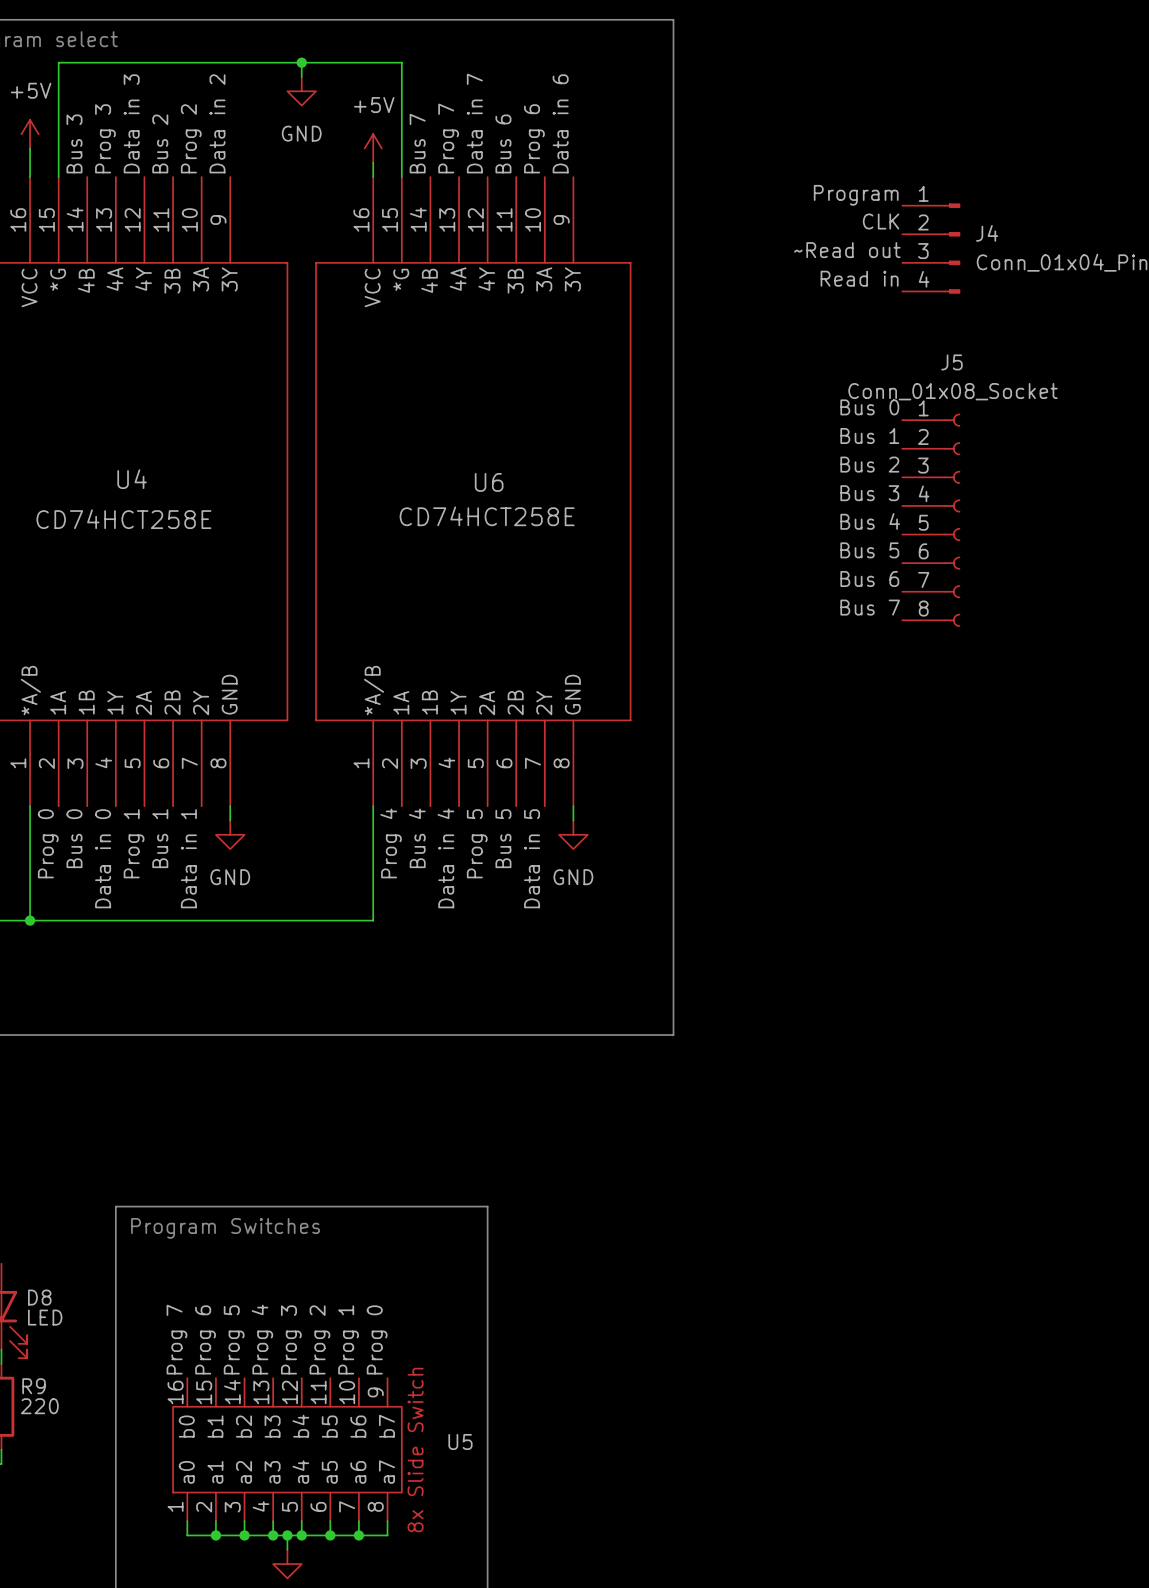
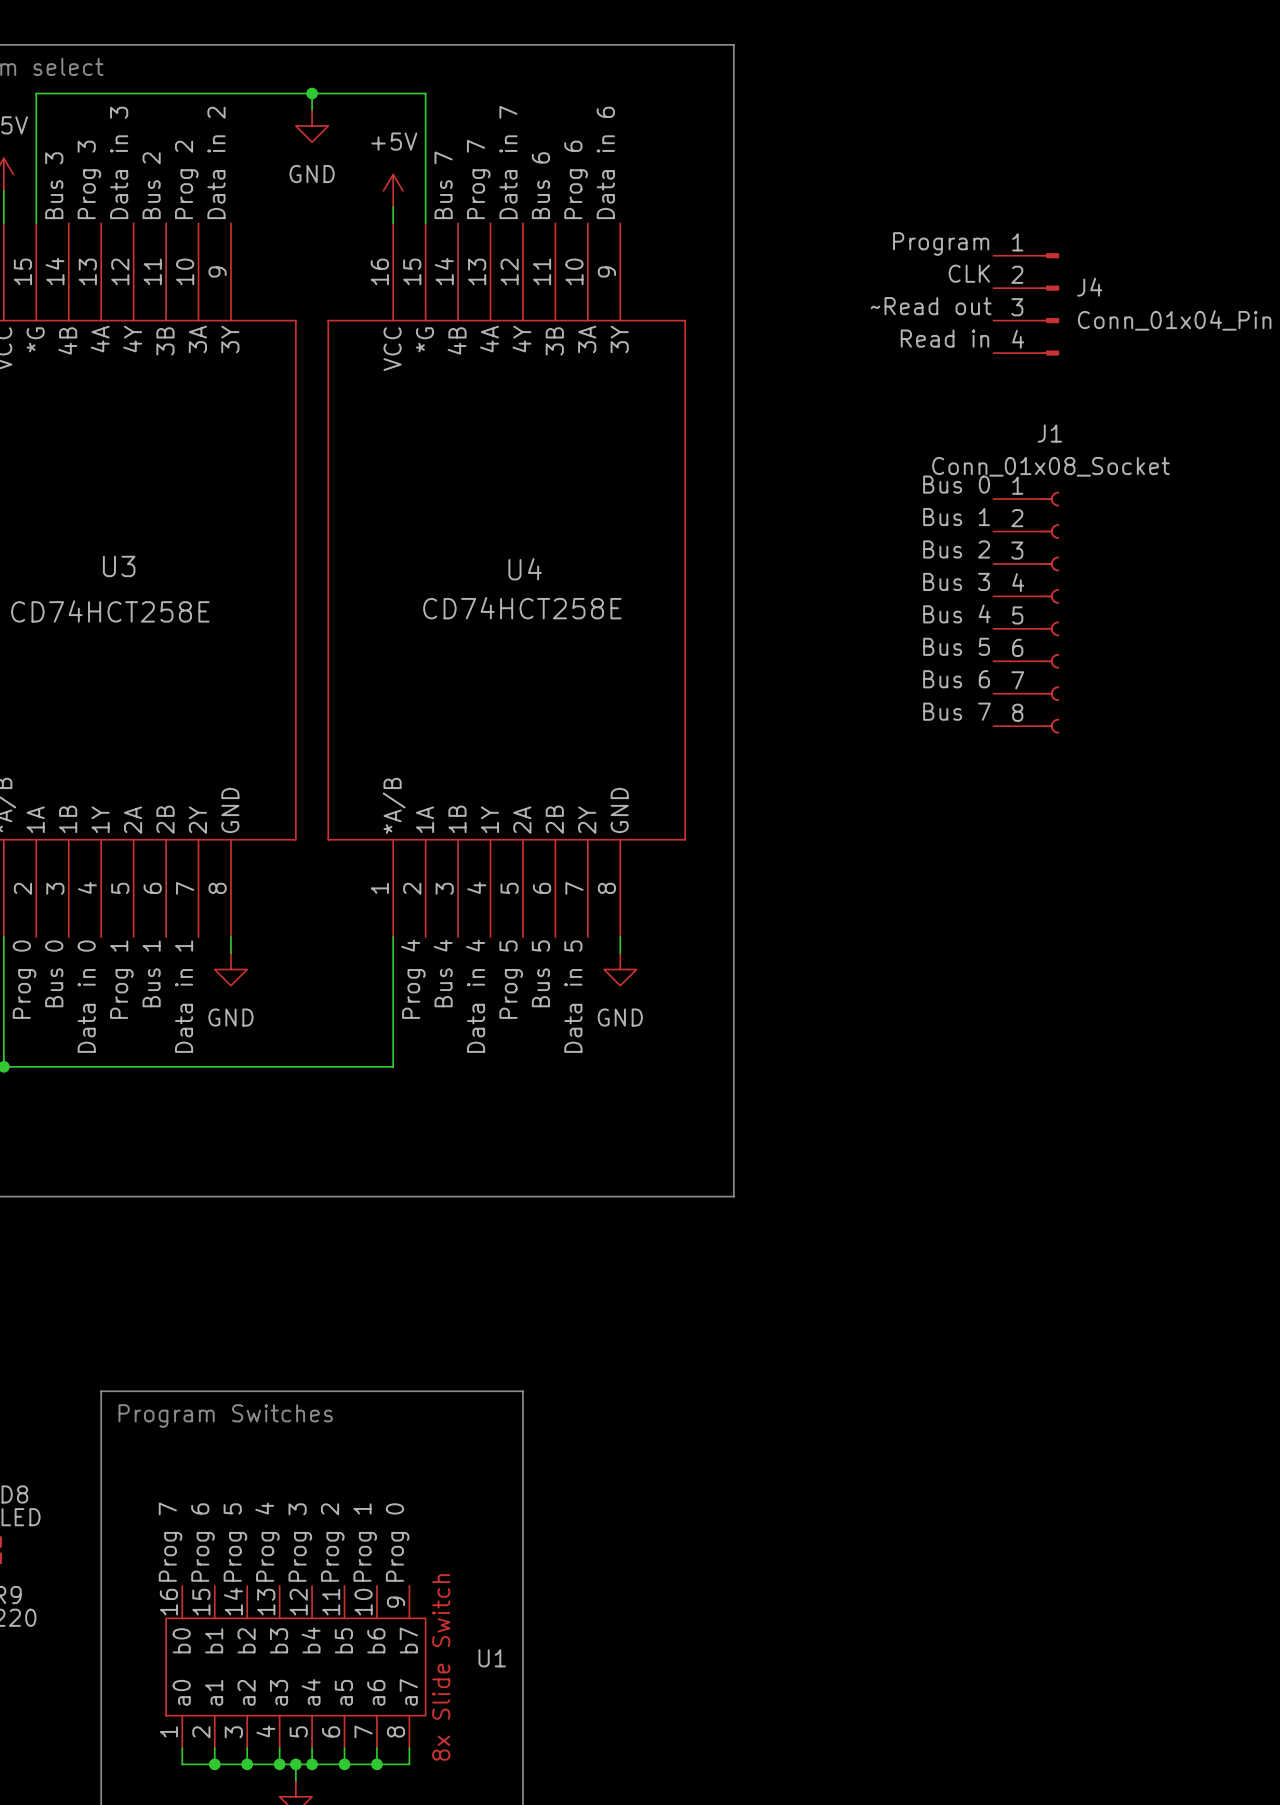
J5 name: J5 (951, 362) -> J1 (1049, 433)
U4 name: U4 (132, 479) -> U3 (119, 566)
U6 name: U6 (489, 482) -> U4 (525, 569)
U5 name: U5 (460, 1441) -> U1 (492, 1658)

